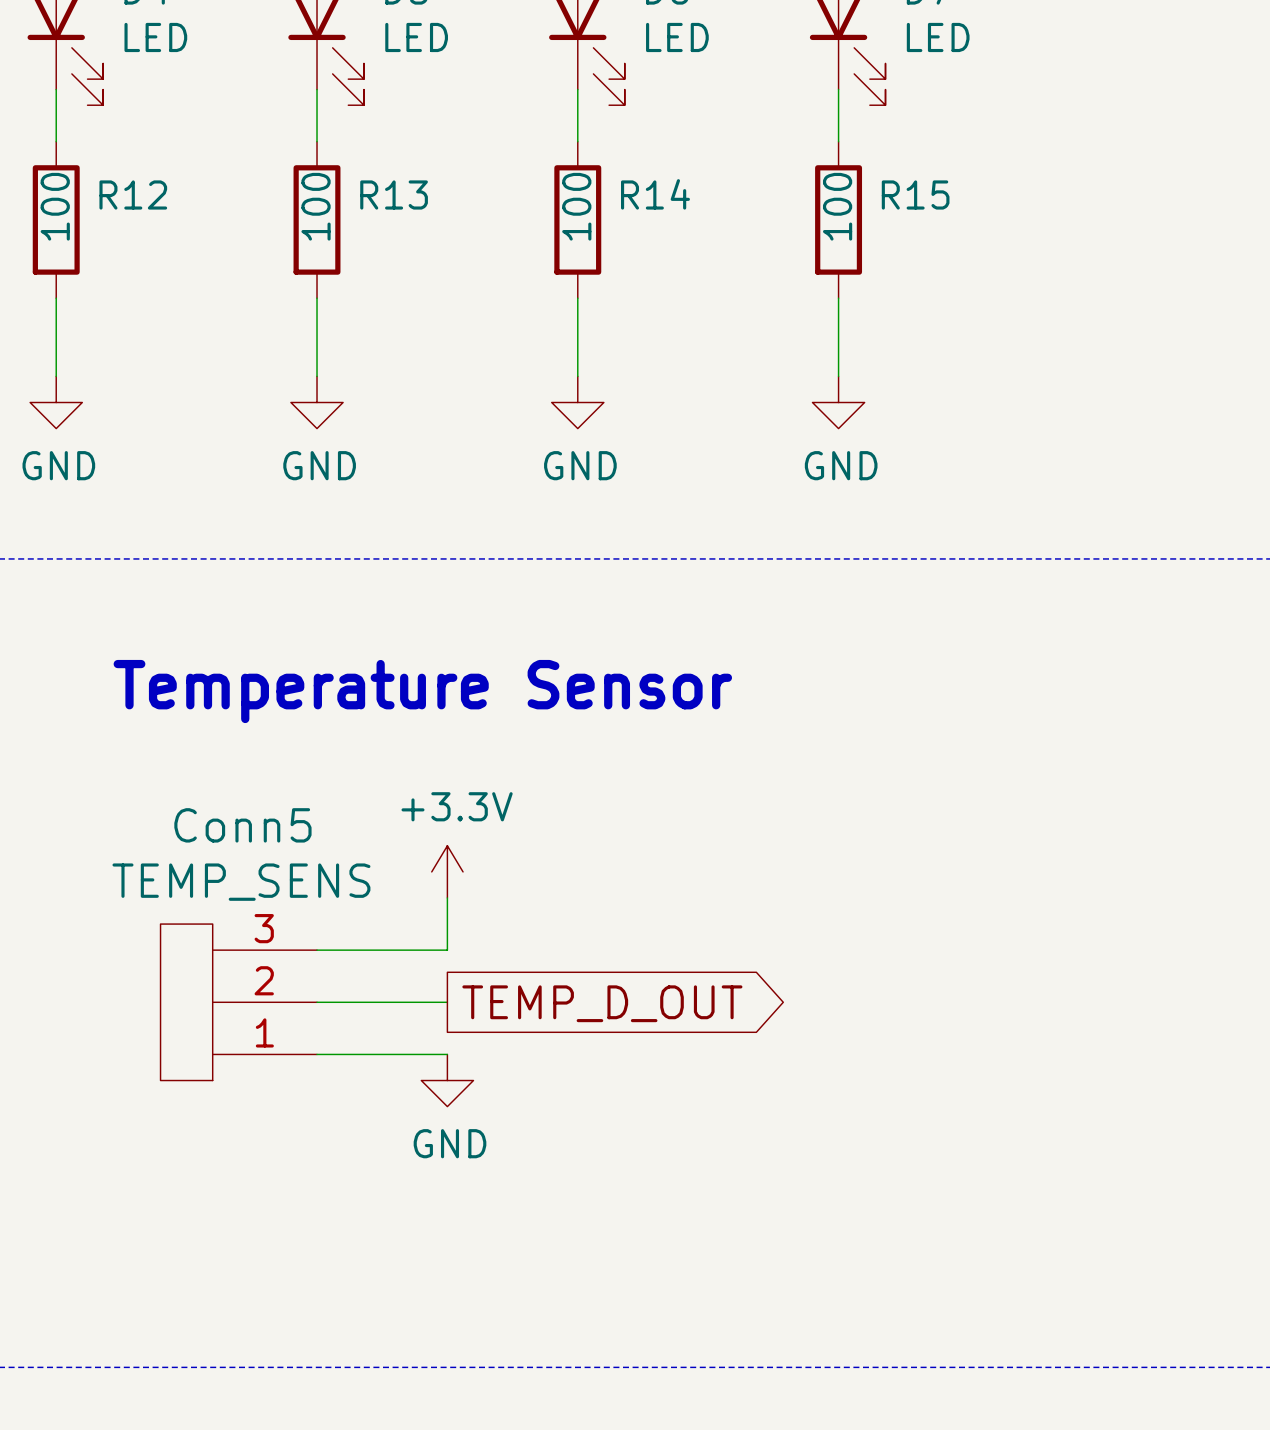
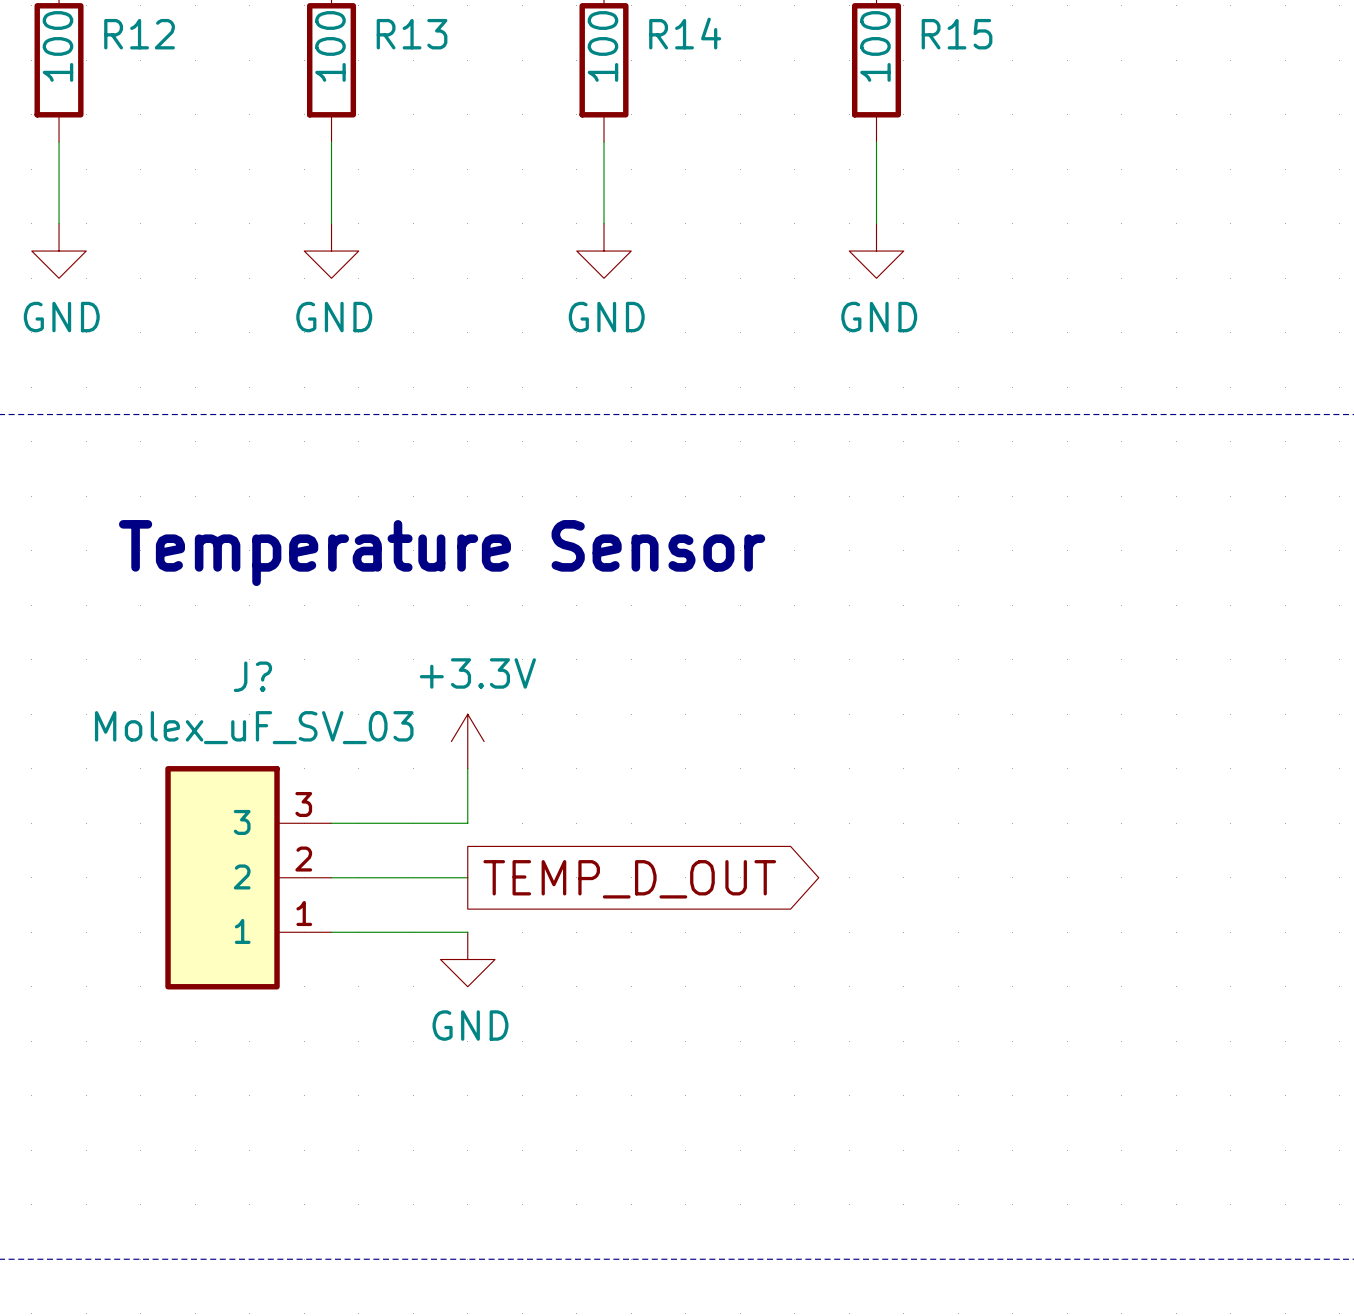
J?: none -> Molex_uF_SV_03 (248, 877)
Conn5: TEMP_SENS (238, 1002) -> none

